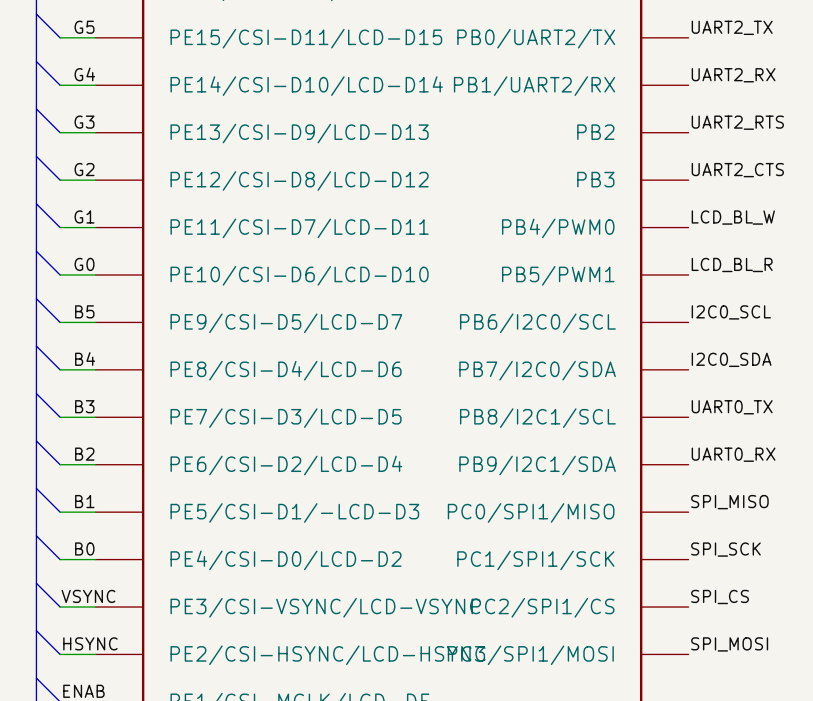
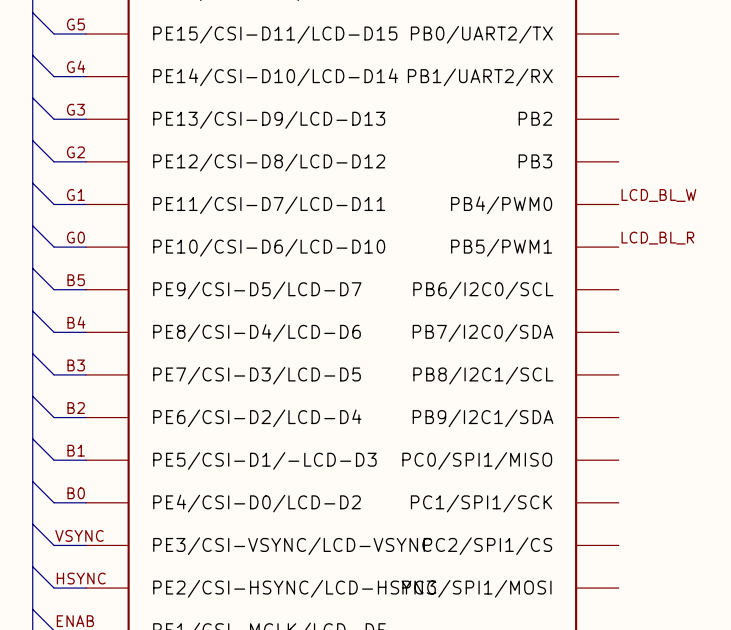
label: UART2_TX (732, 27) -> none
label: UART2_RX (733, 75) -> none
label: UART2_RTS (737, 122) -> none
label: UART2_CTS (737, 170) -> none
label: I2C0_SCL (731, 312) -> none
label: I2C0_SDA (731, 359) -> none
label: UART0_TX (732, 407) -> none
label: UART0_RX (733, 454) -> none
label: SPI_MISO (729, 502) -> none
label: SPI_SCK (725, 549) -> none
label: SPI_CS (720, 596) -> none
label: SPI_MOSI (729, 644) -> none

